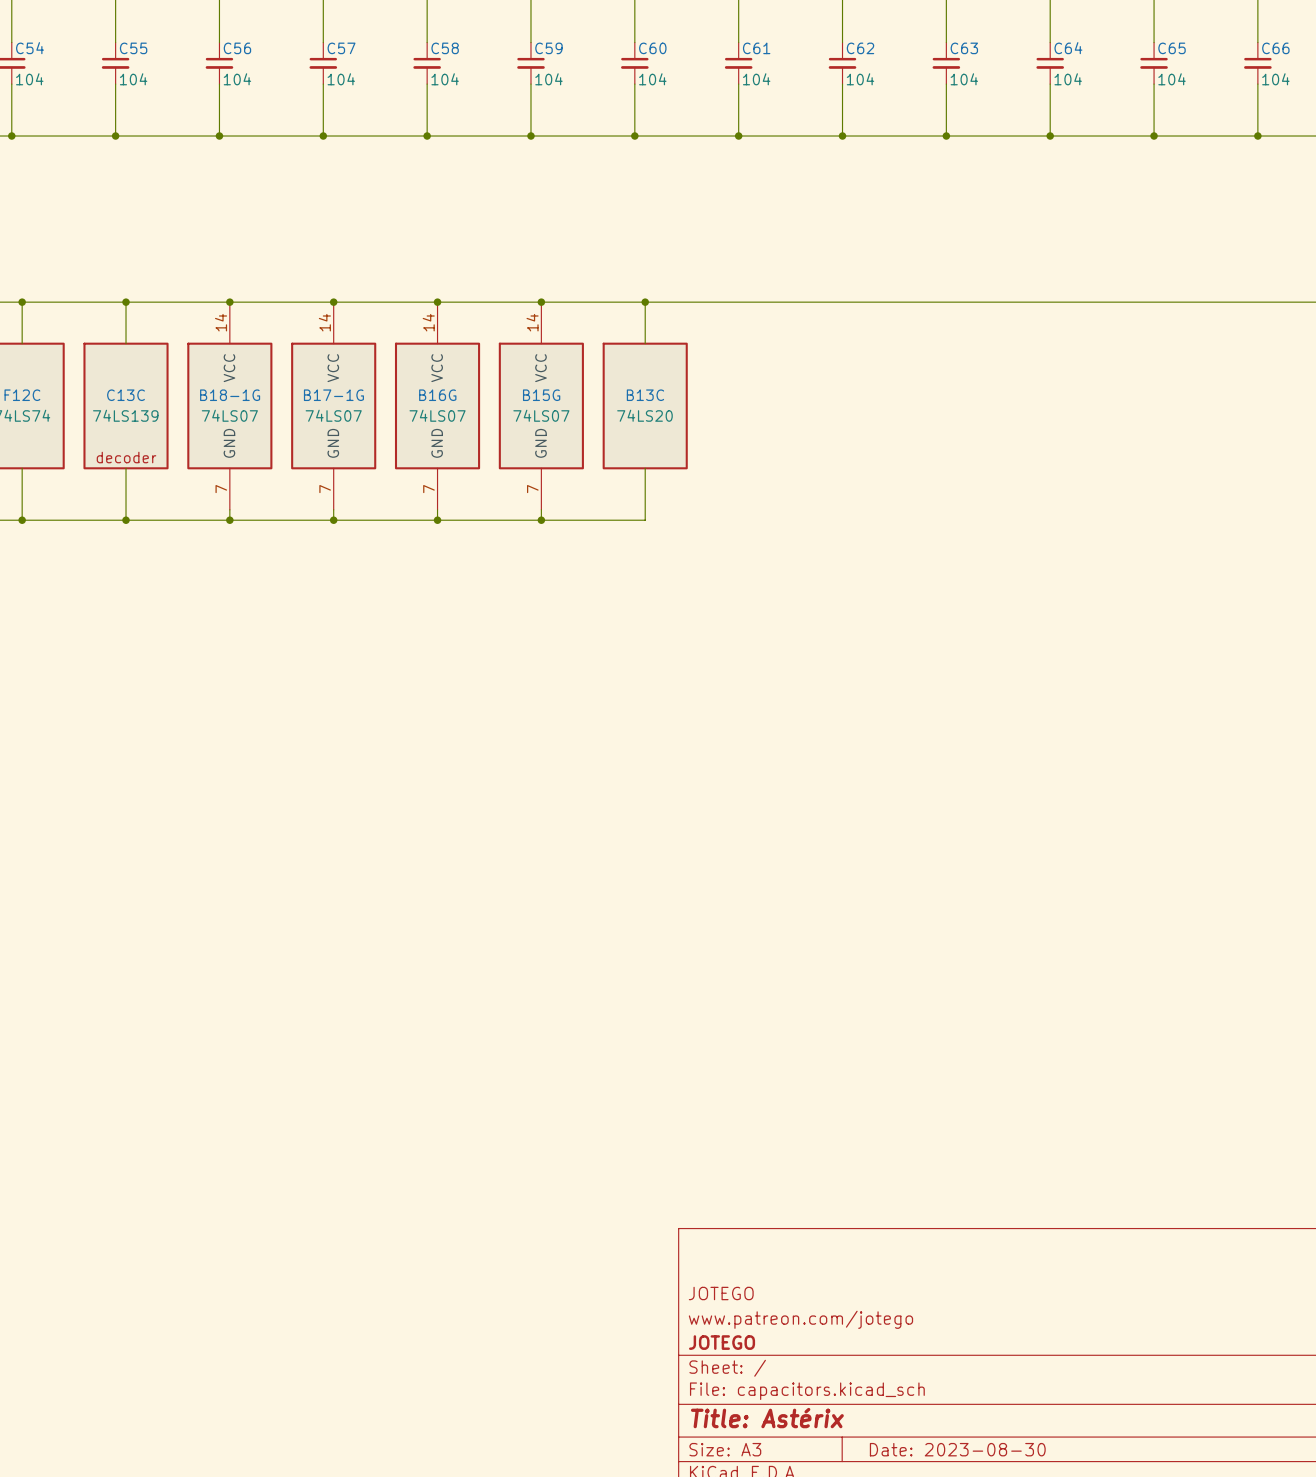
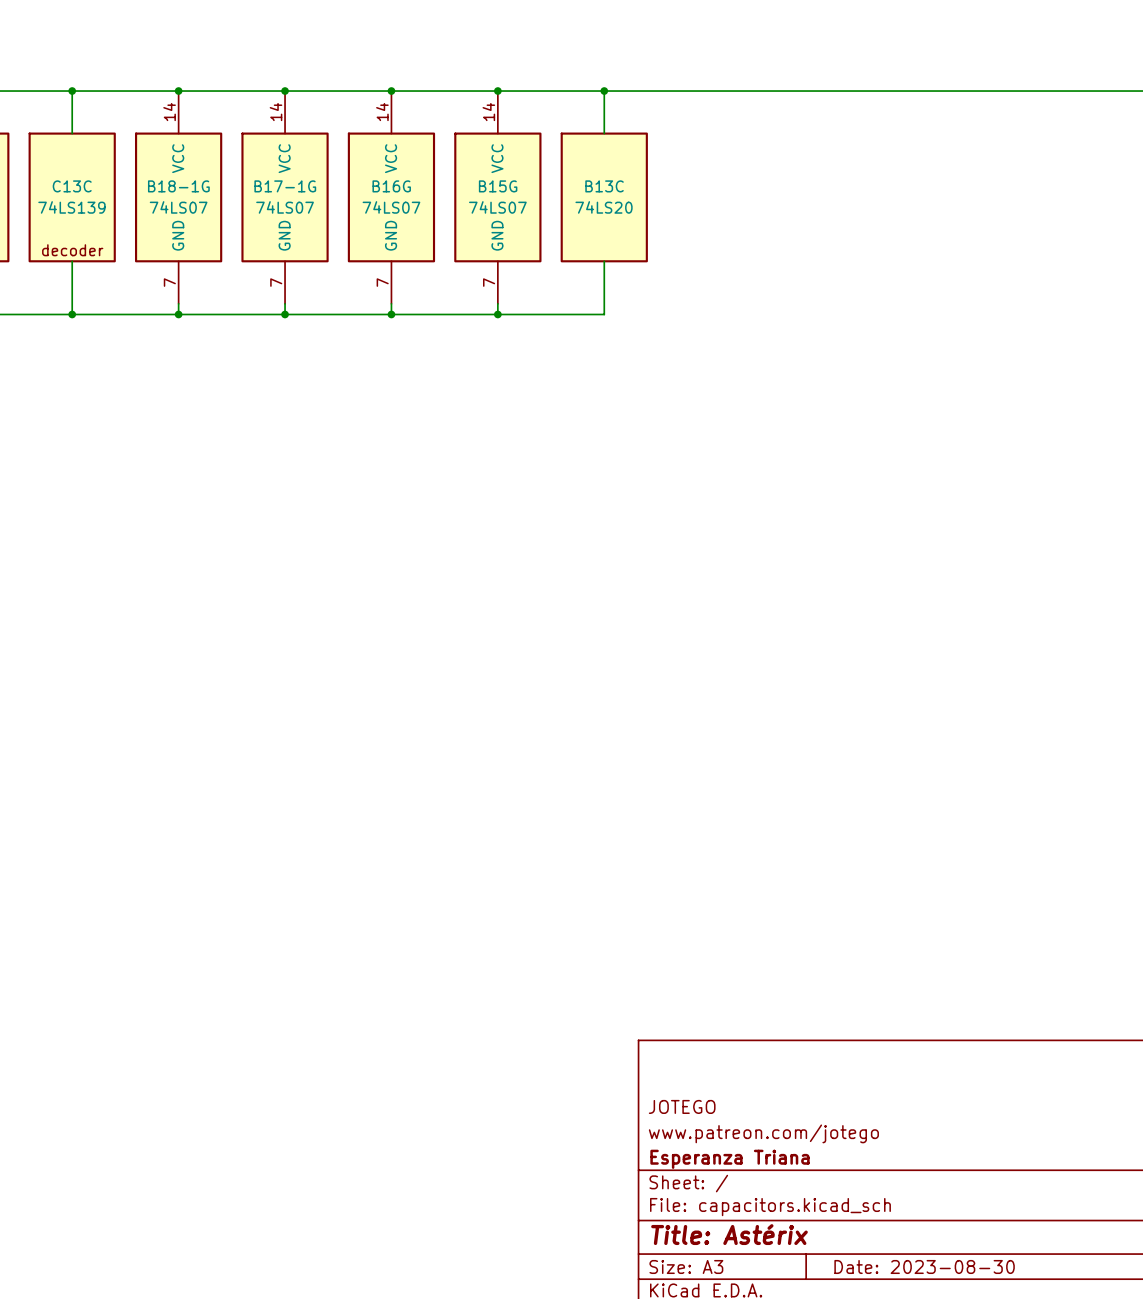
title block: JOTEGO (722, 1342) -> Esperanza Triana (729, 1159)

